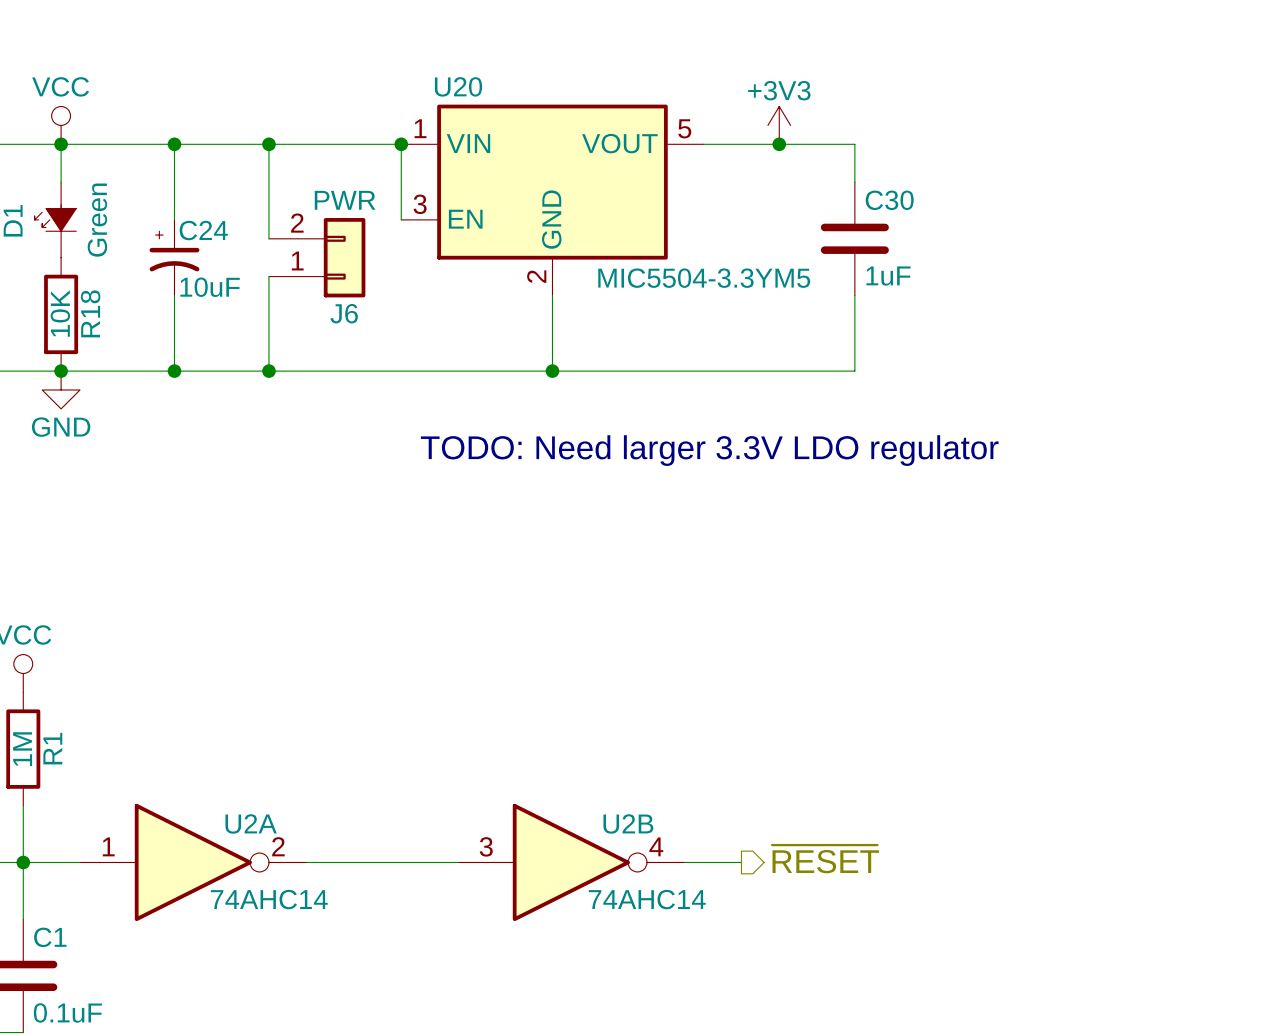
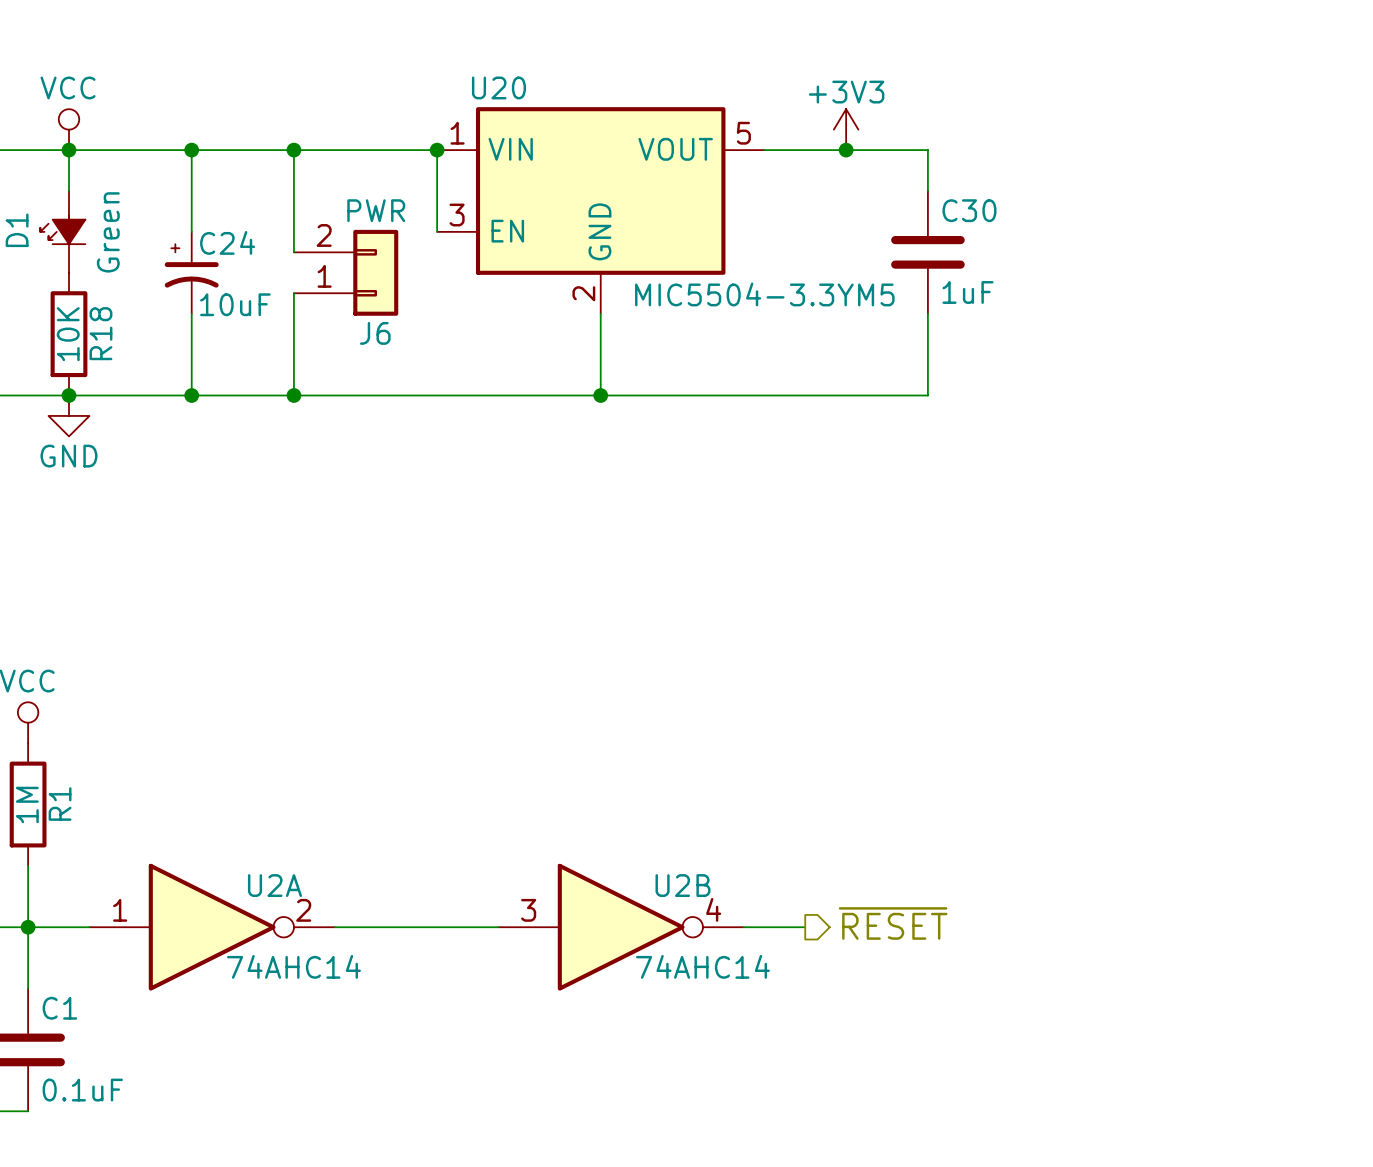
text: TODO: Need larger 3.3V LDO regulator (709, 450) -> none

